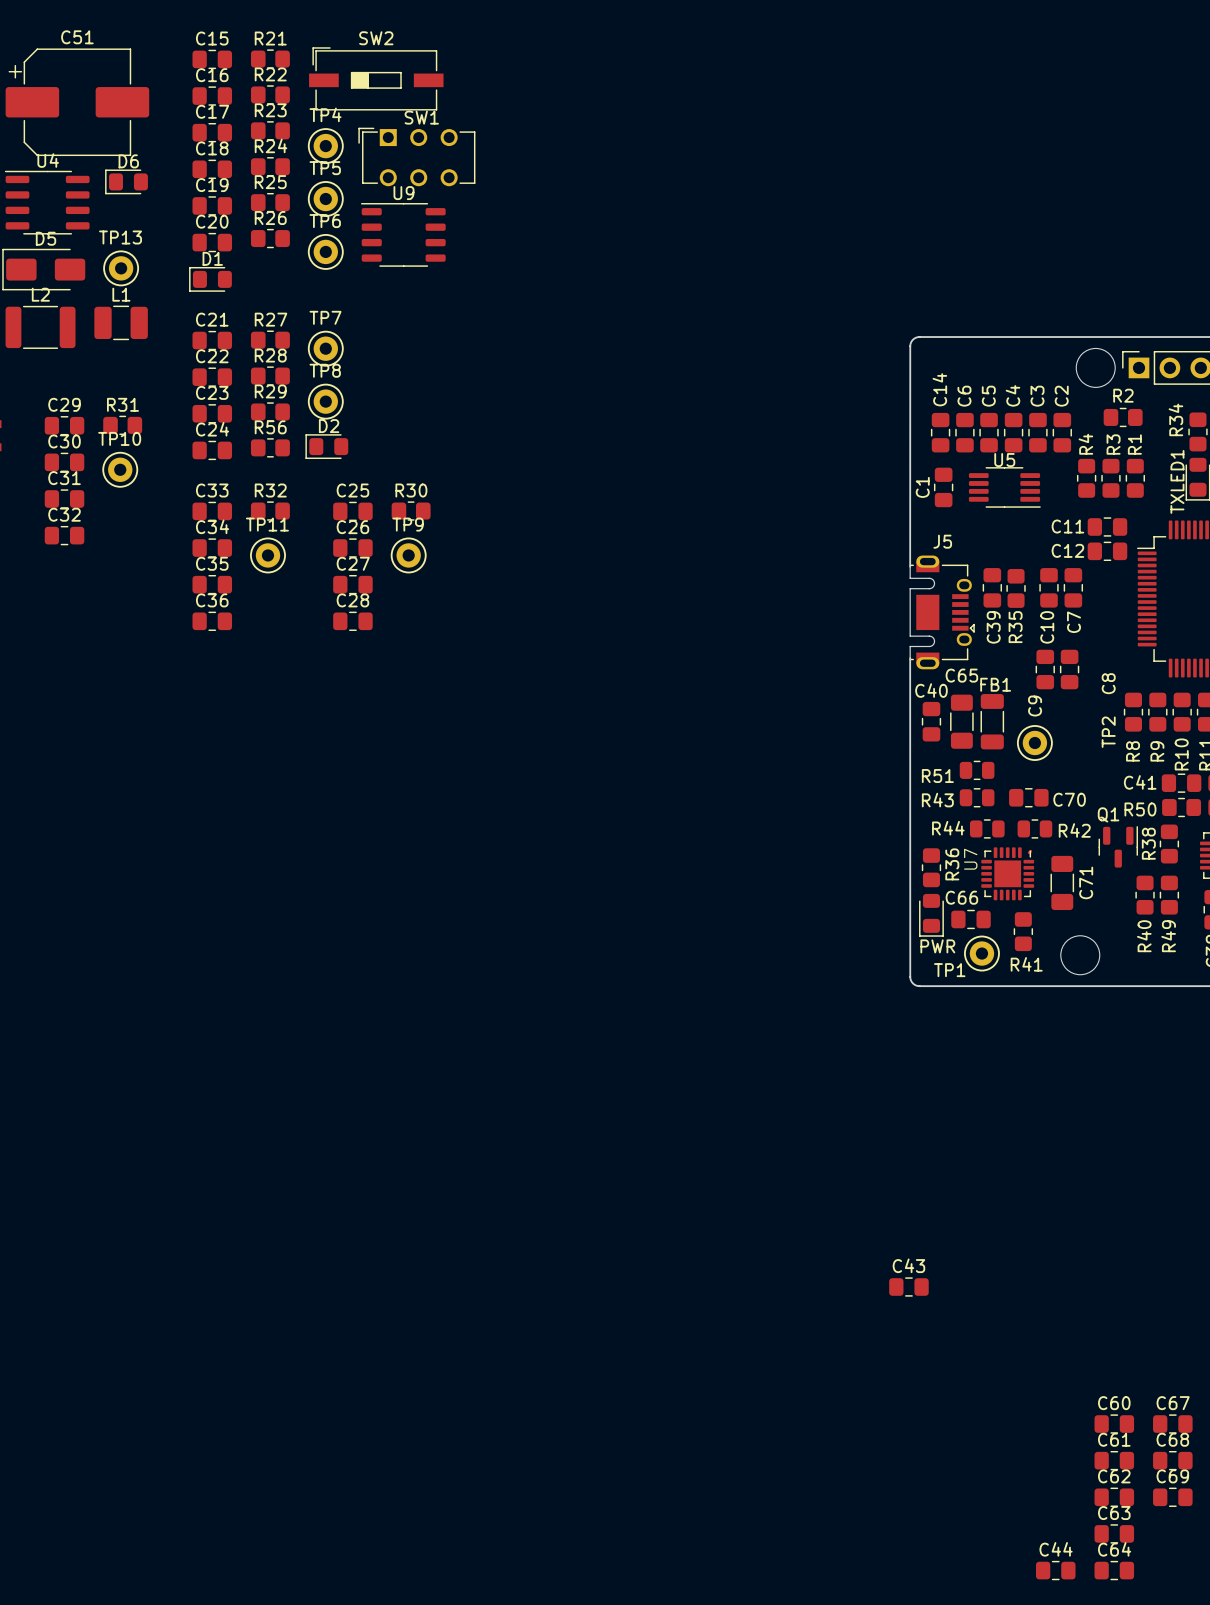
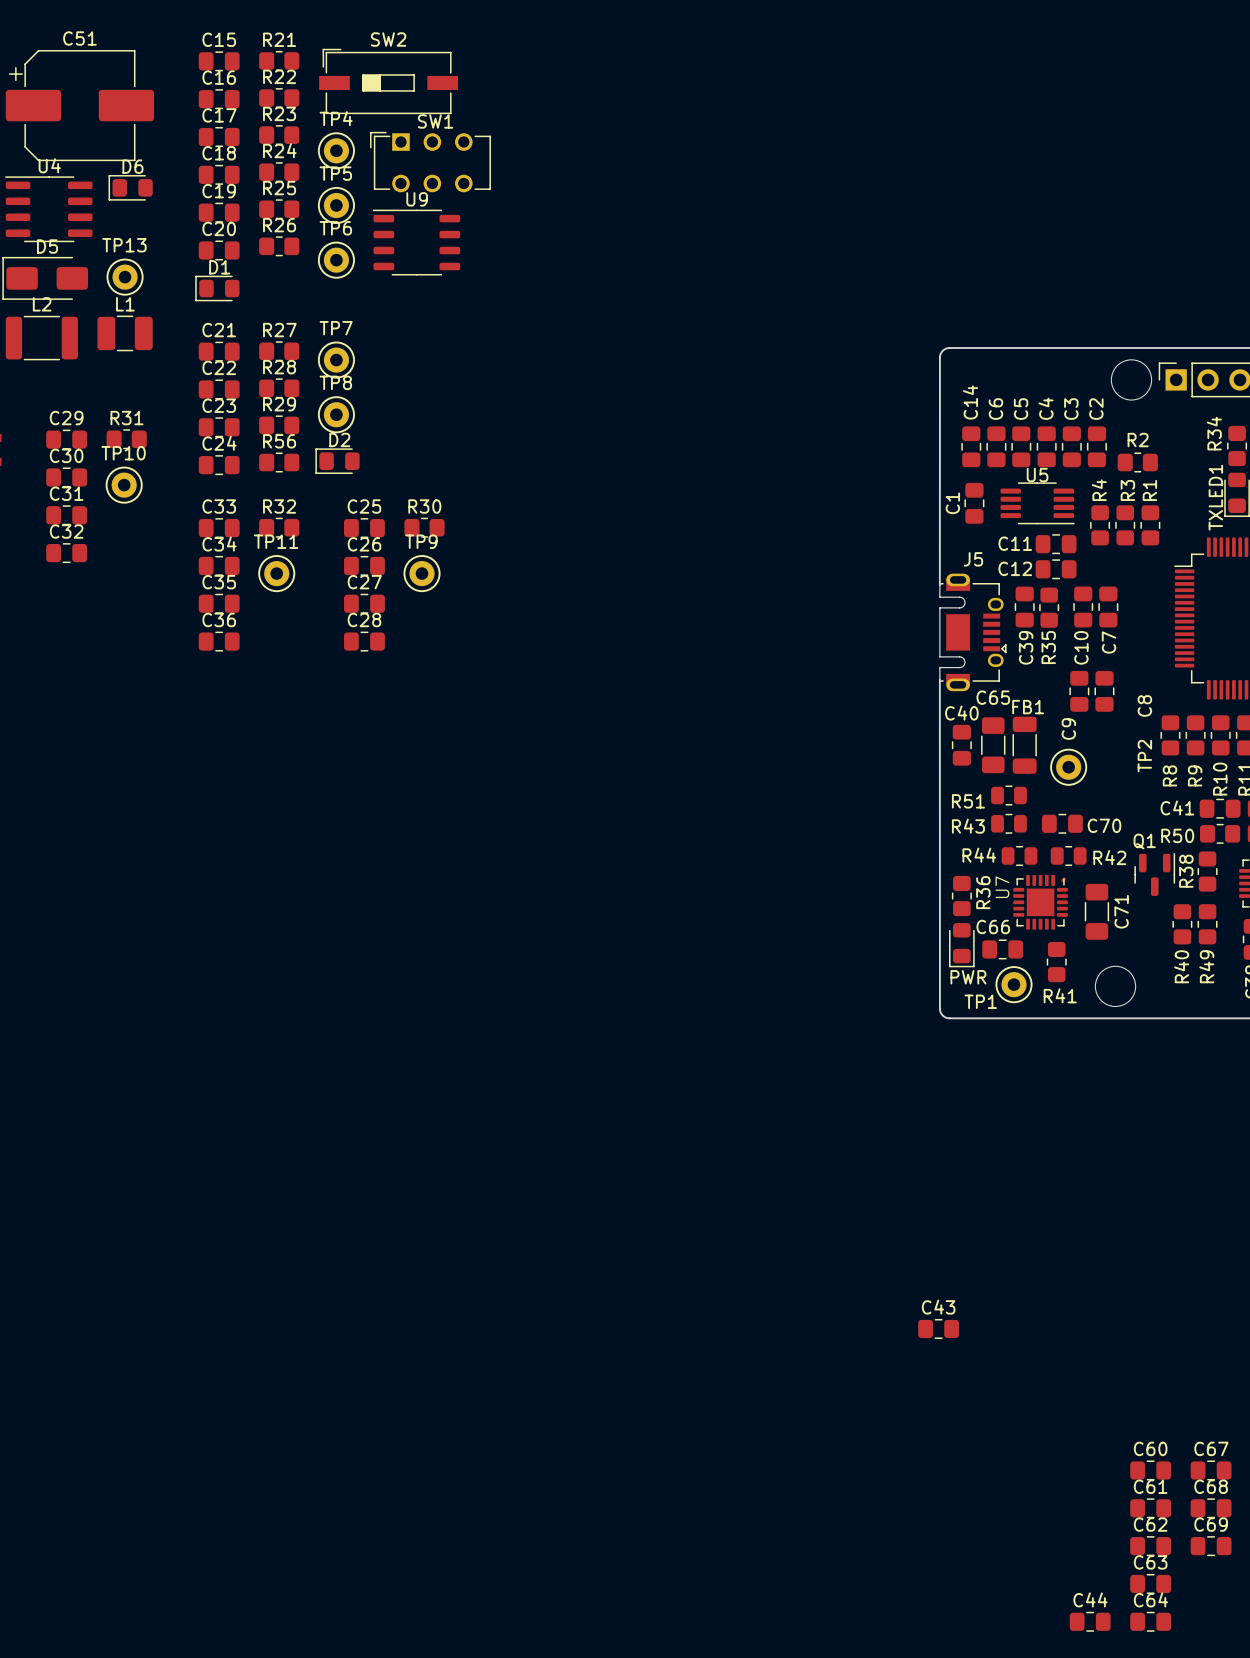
R2 position: (1123, 417) -> (1137, 462)
R4 position: (1086, 478) -> (1100, 525)
R3 position: (1110, 478) -> (1125, 525)
R1 position: (1135, 478) -> (1150, 525)
C11 position: (1107, 526) -> (1056, 544)
C12 position: (1107, 551) -> (1056, 569)

